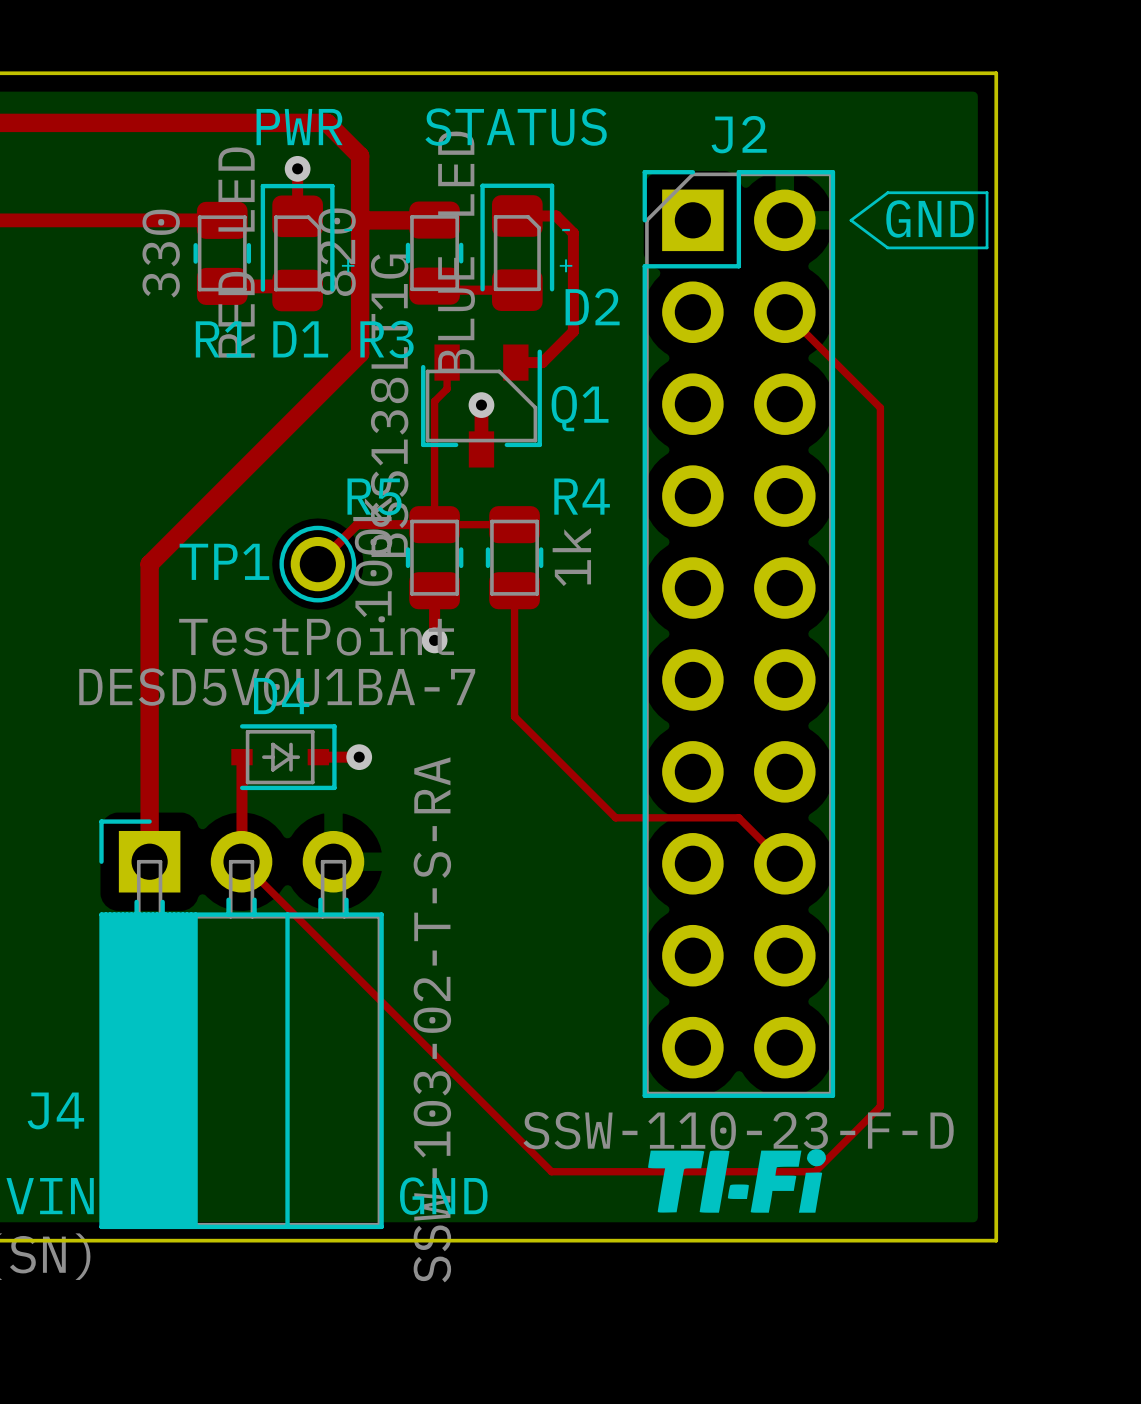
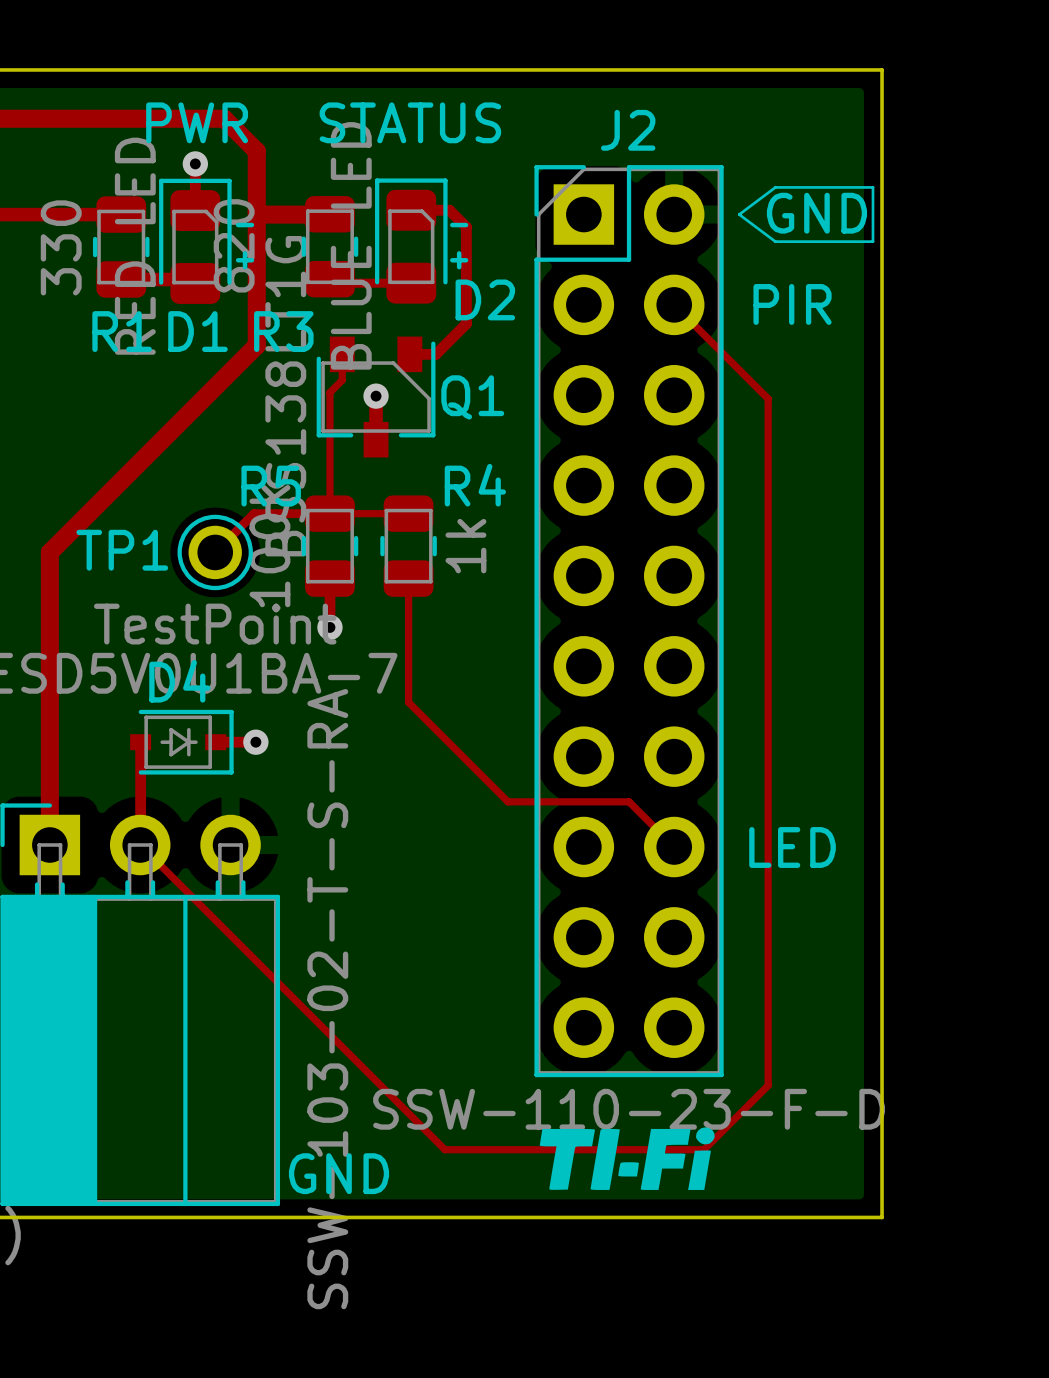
text: none -> PIR (792, 304)
text: none -> LED (792, 847)

